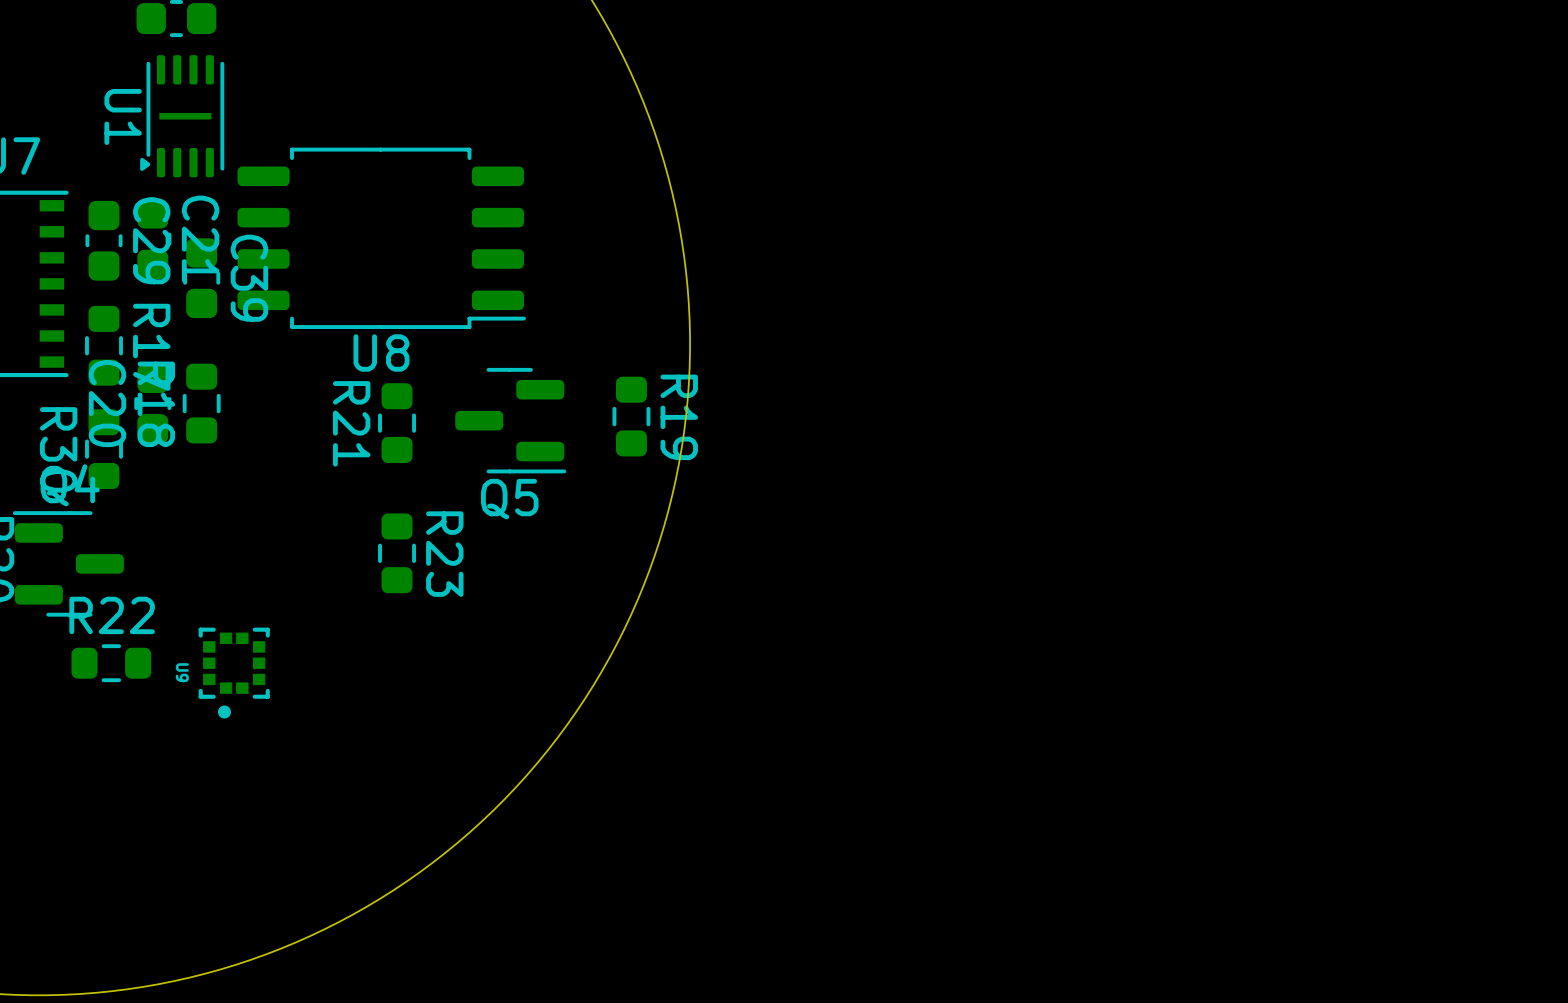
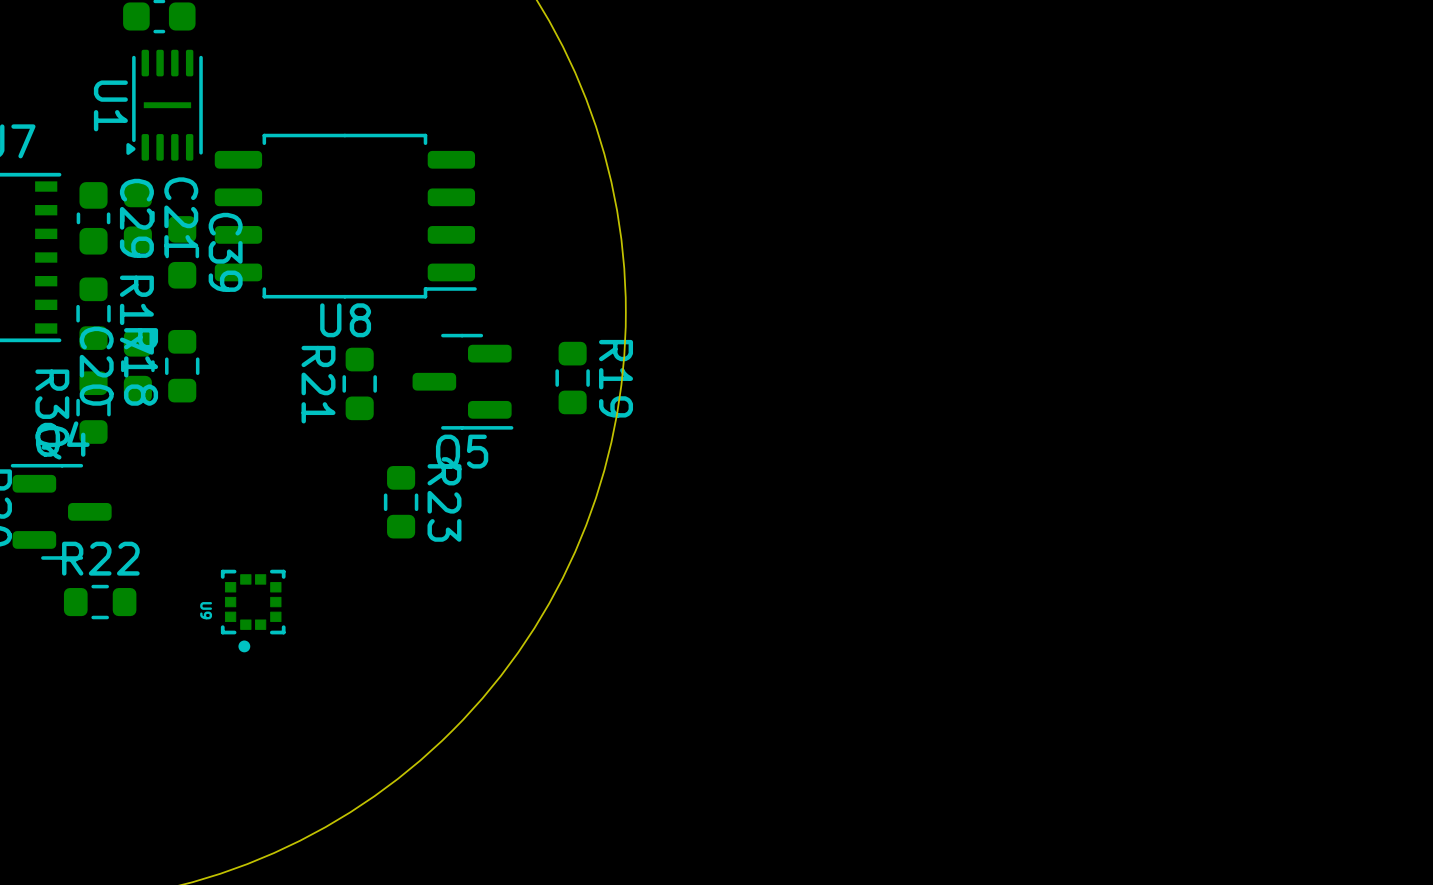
R23 position: (397, 553) -> (401, 502)
U9 position: (234, 673) -> (253, 611)

